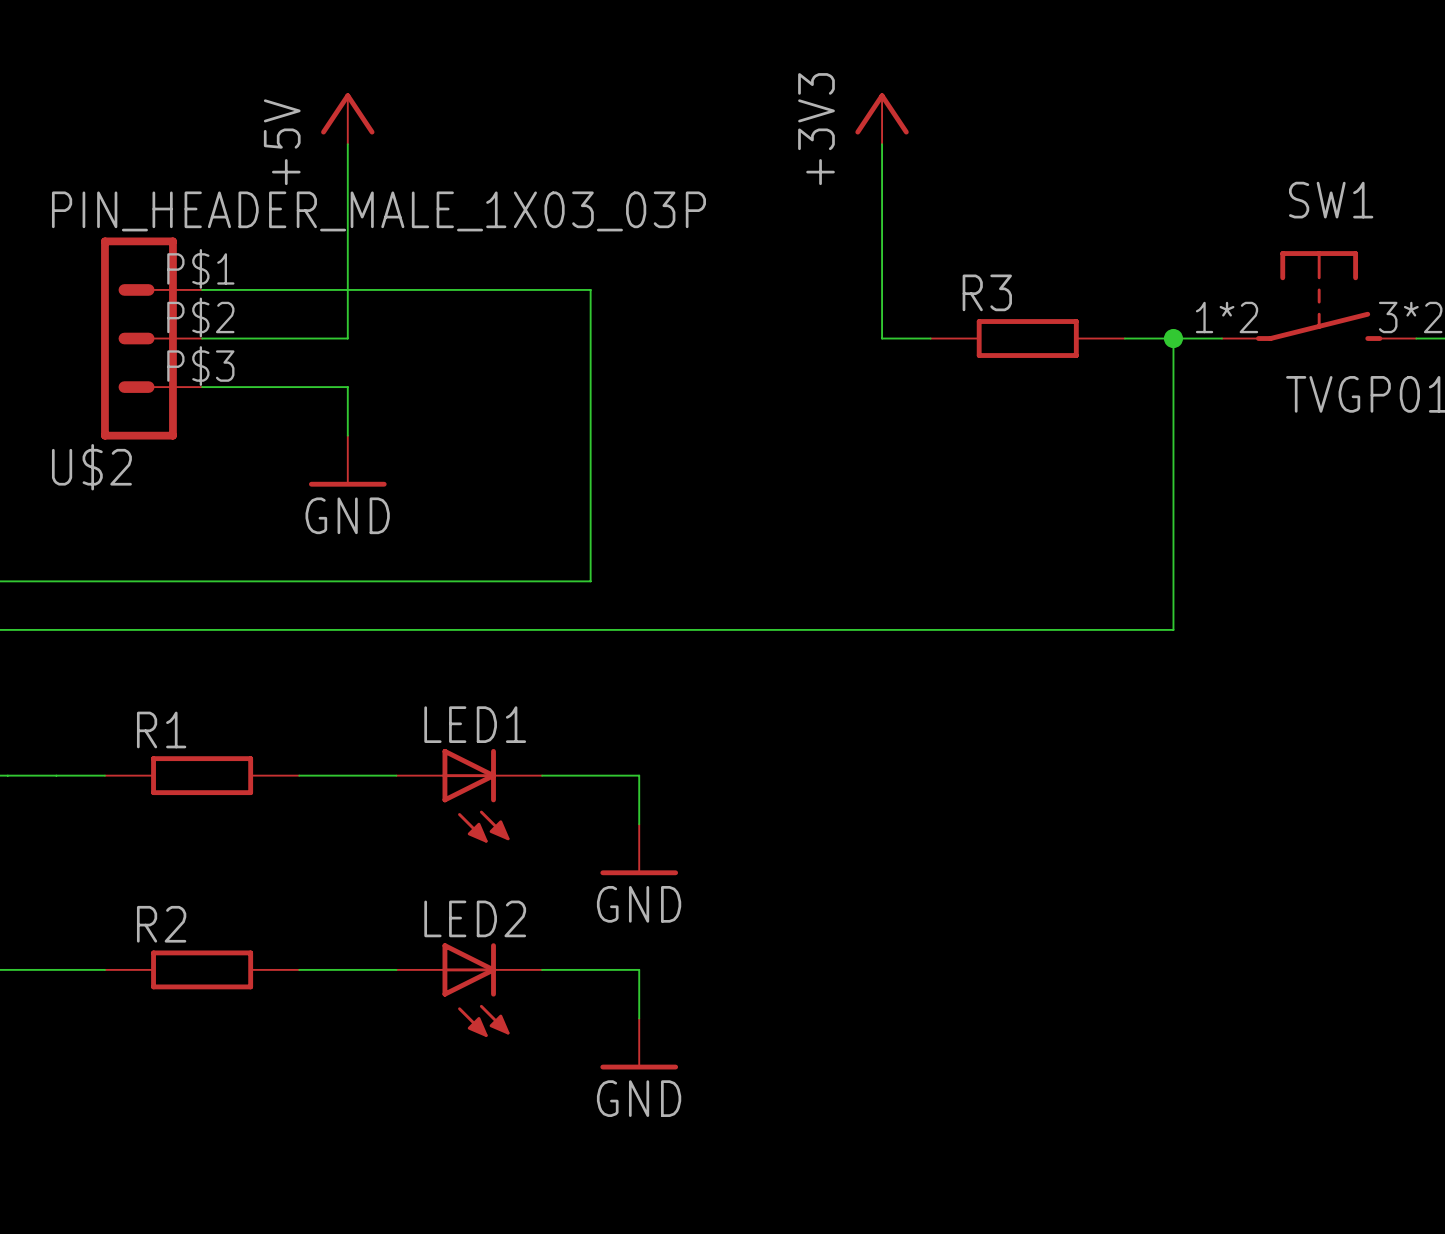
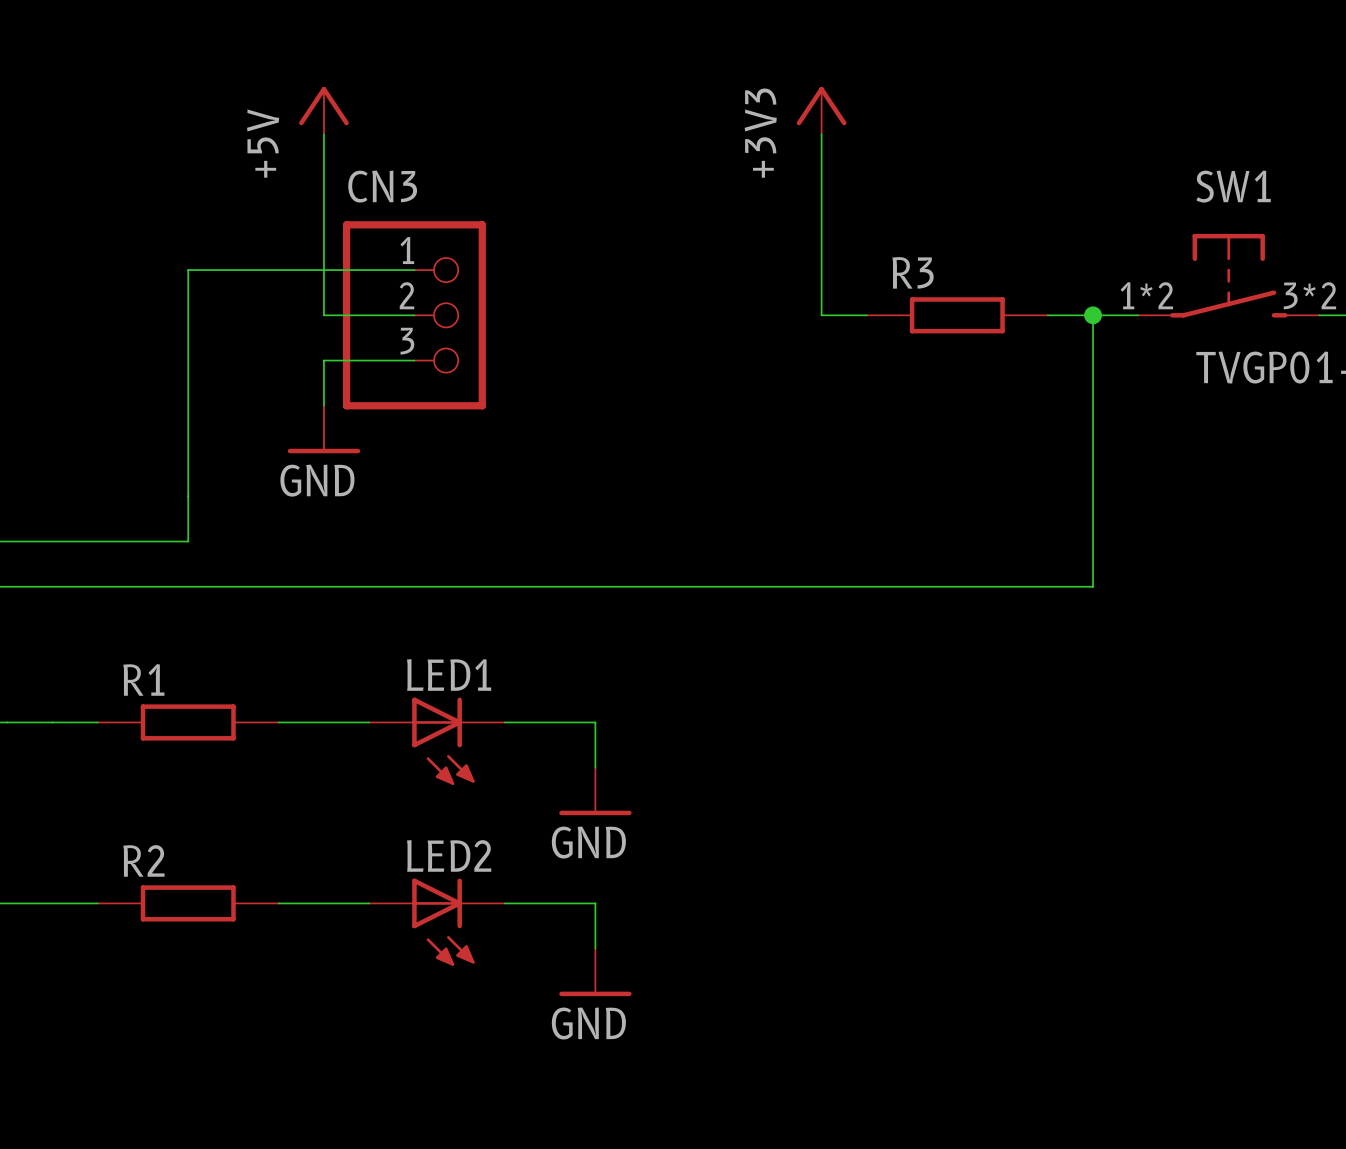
wire: (444, 289) (590, 289) (590, 581) (202, 581) -> (188, 270) (188, 541)
U$2: PIN_HEADER_MALE_1X03_03P (151, 338) -> none
wire: (202, 338) (347, 338) -> (414, 315) (323, 315)
CN3: none -> (414, 315)
wire: (202, 387) (347, 387) -> (414, 360) (323, 360)

